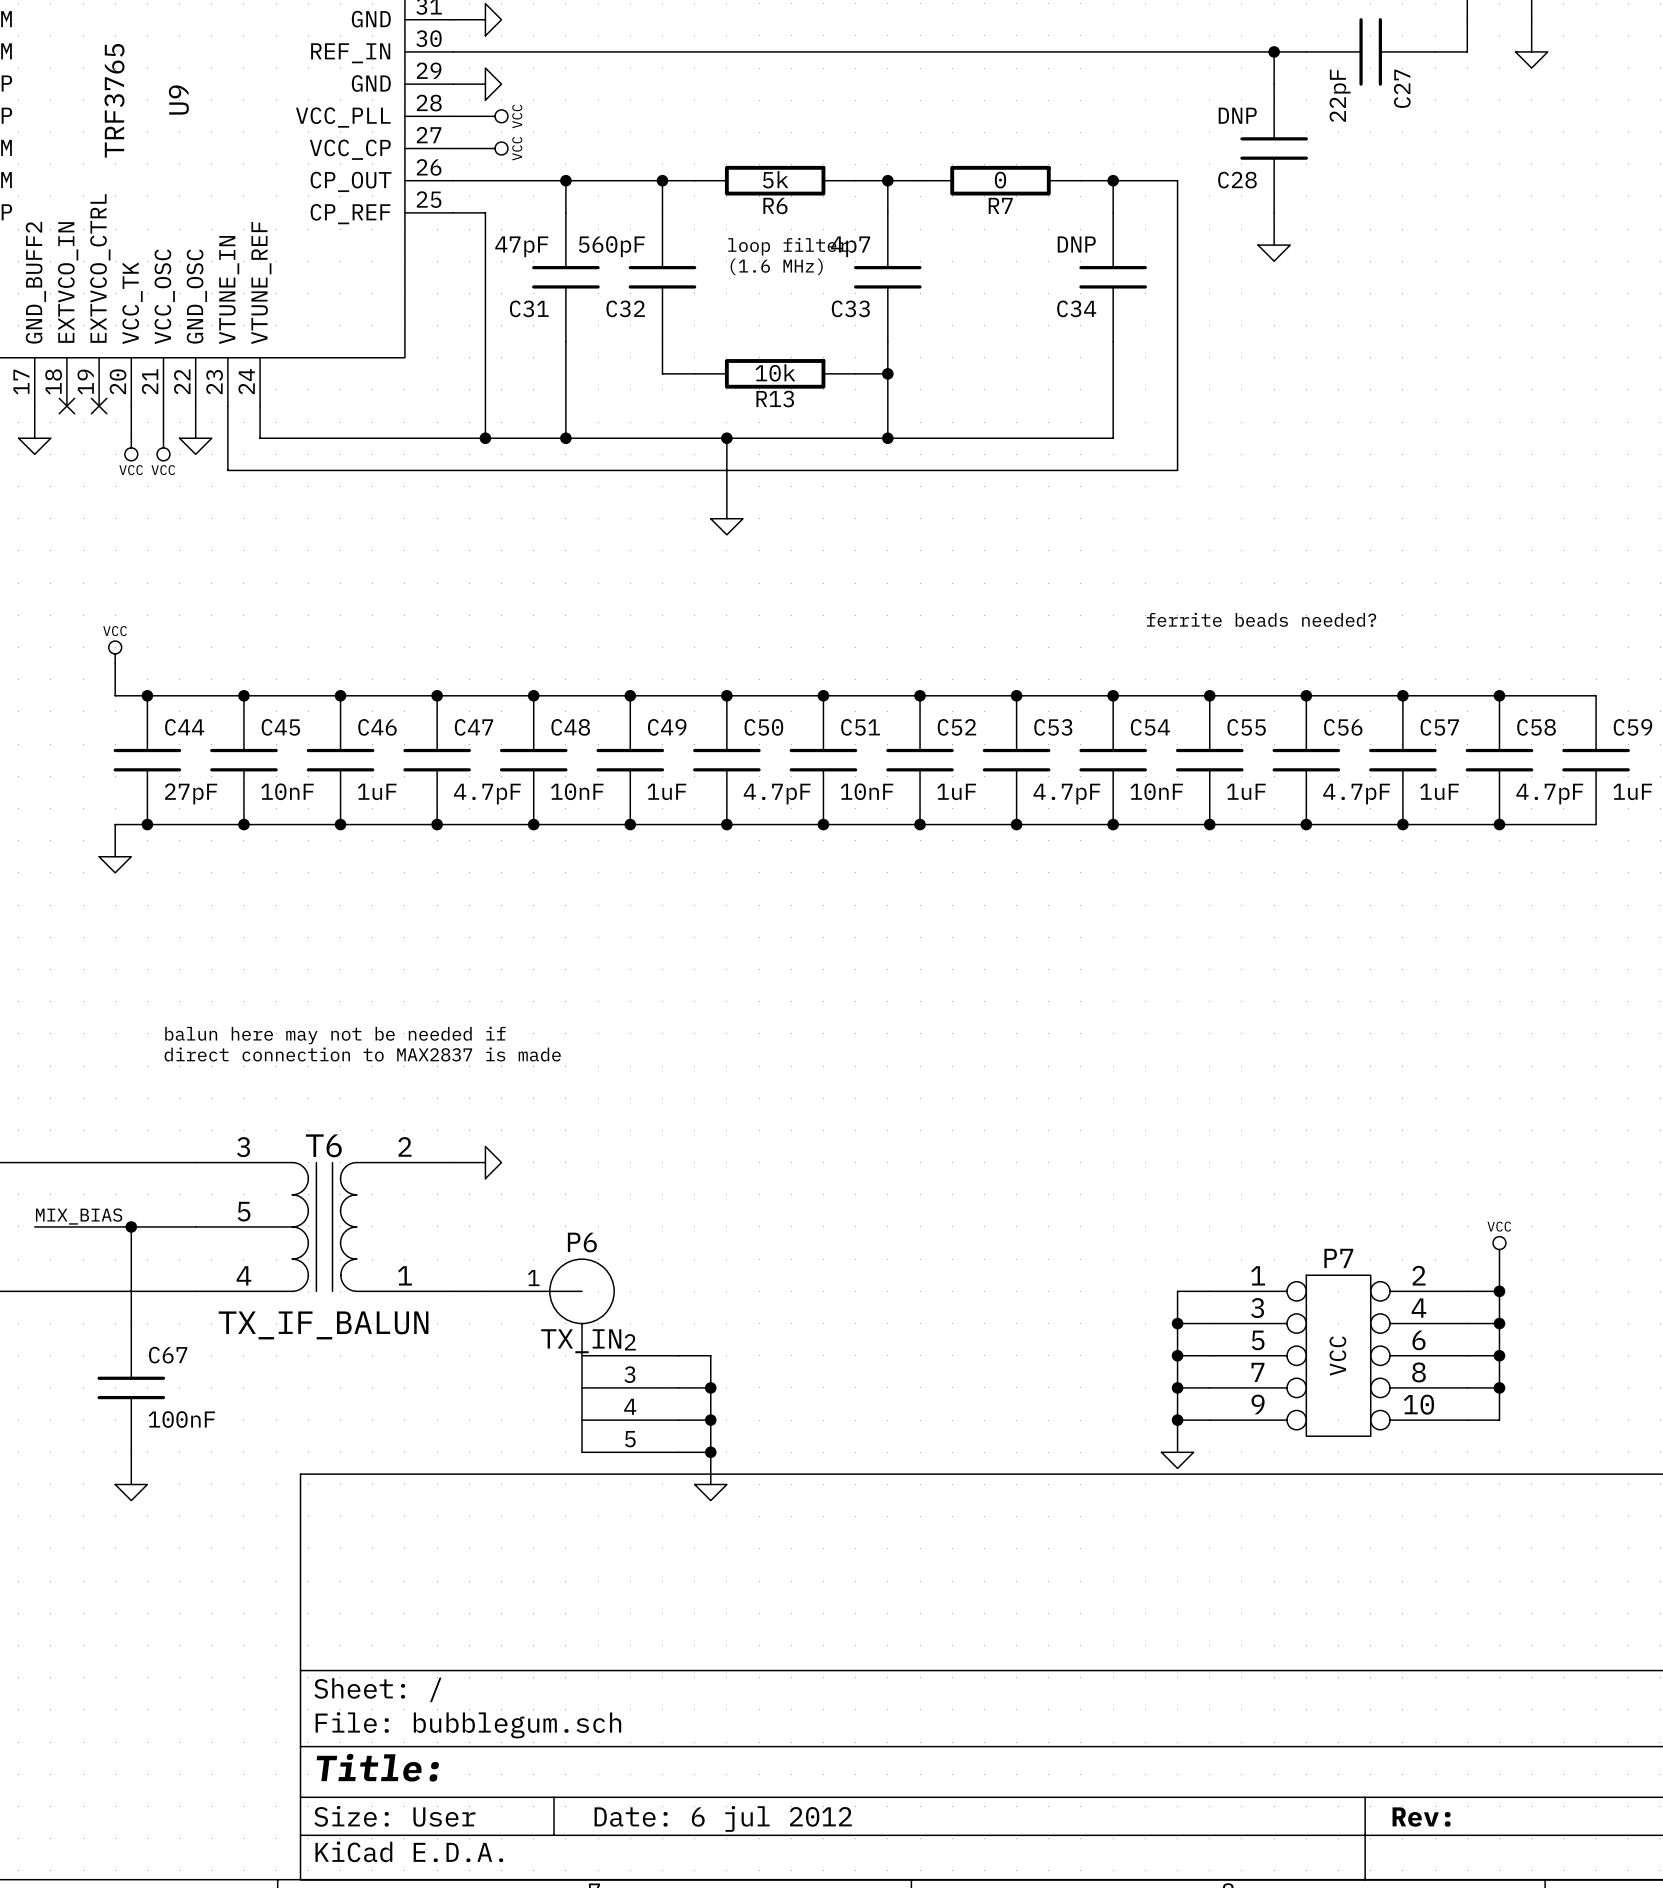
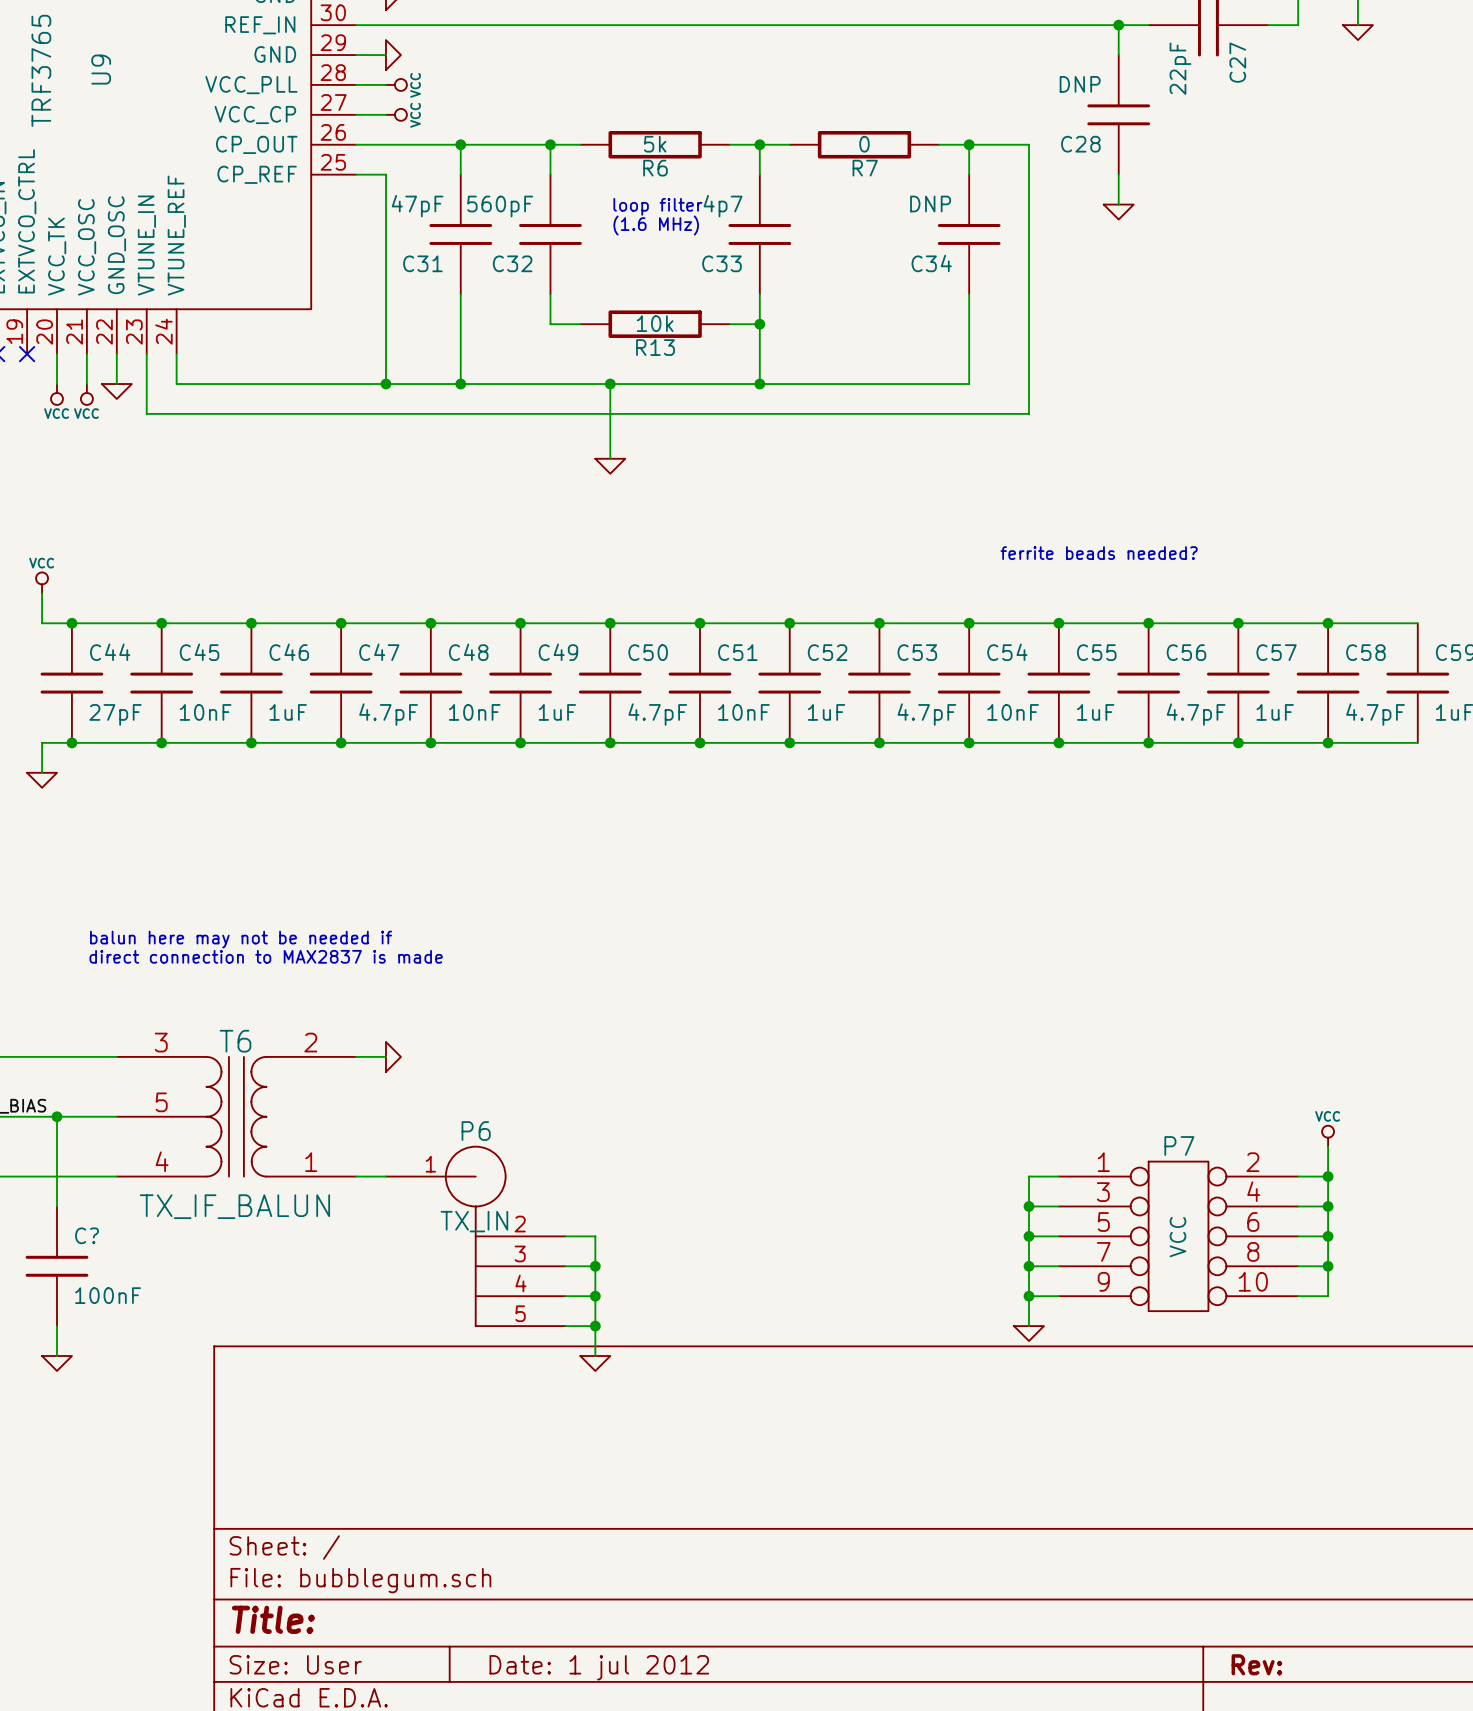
C67 name: C67 (168, 1355) -> C? (87, 1235)
title block: Date: 6 jul 2012 (723, 1818) -> Date: 1 jul 2012 (599, 1667)

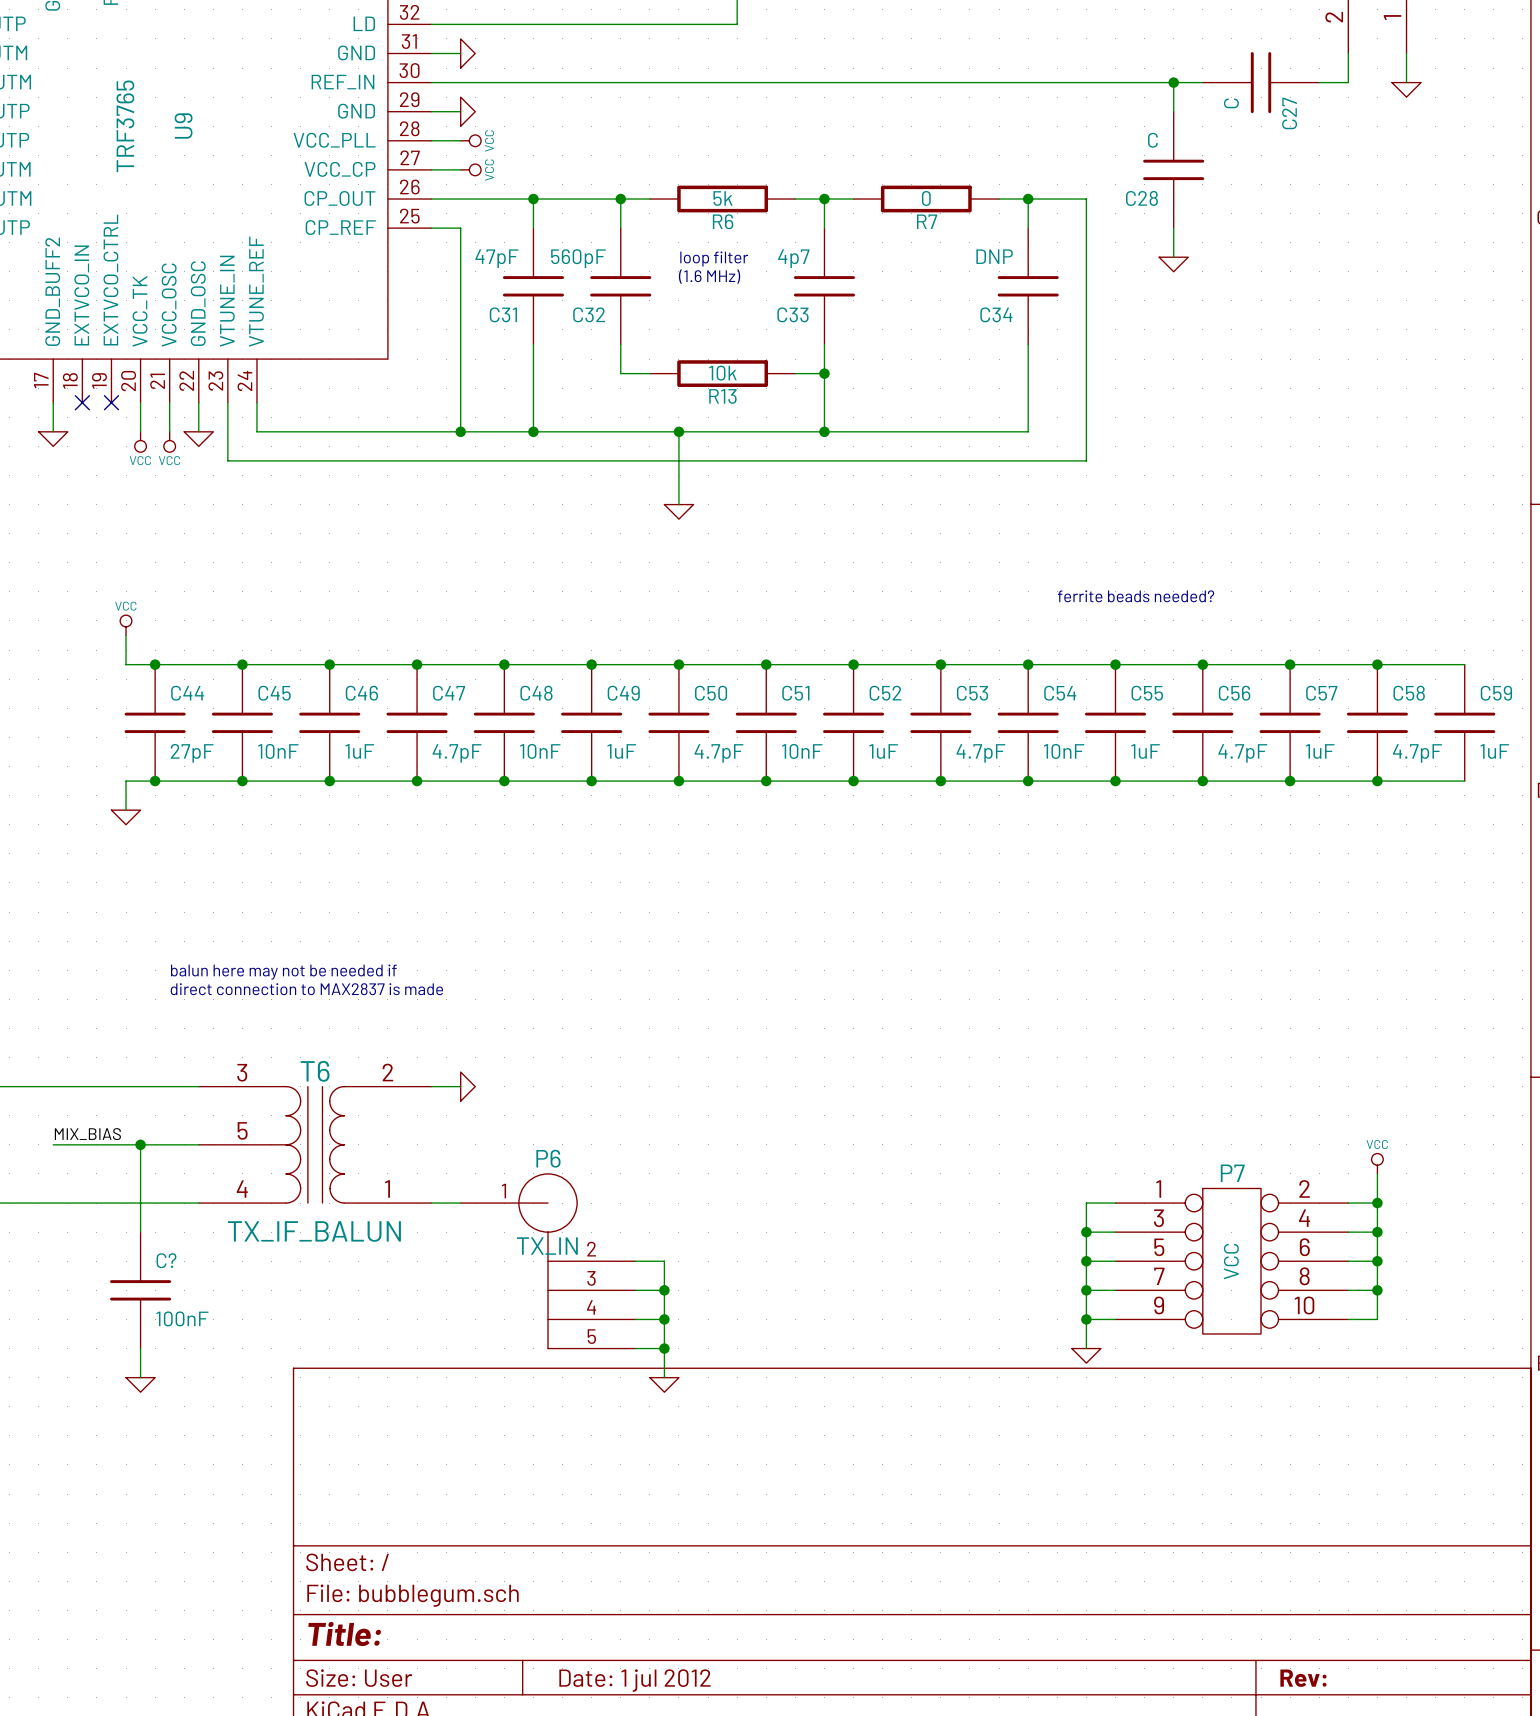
C27 value: 22pF (1180, 68) -> C (1231, 103)
C28 value: DNP (1080, 84) -> C (1152, 140)

